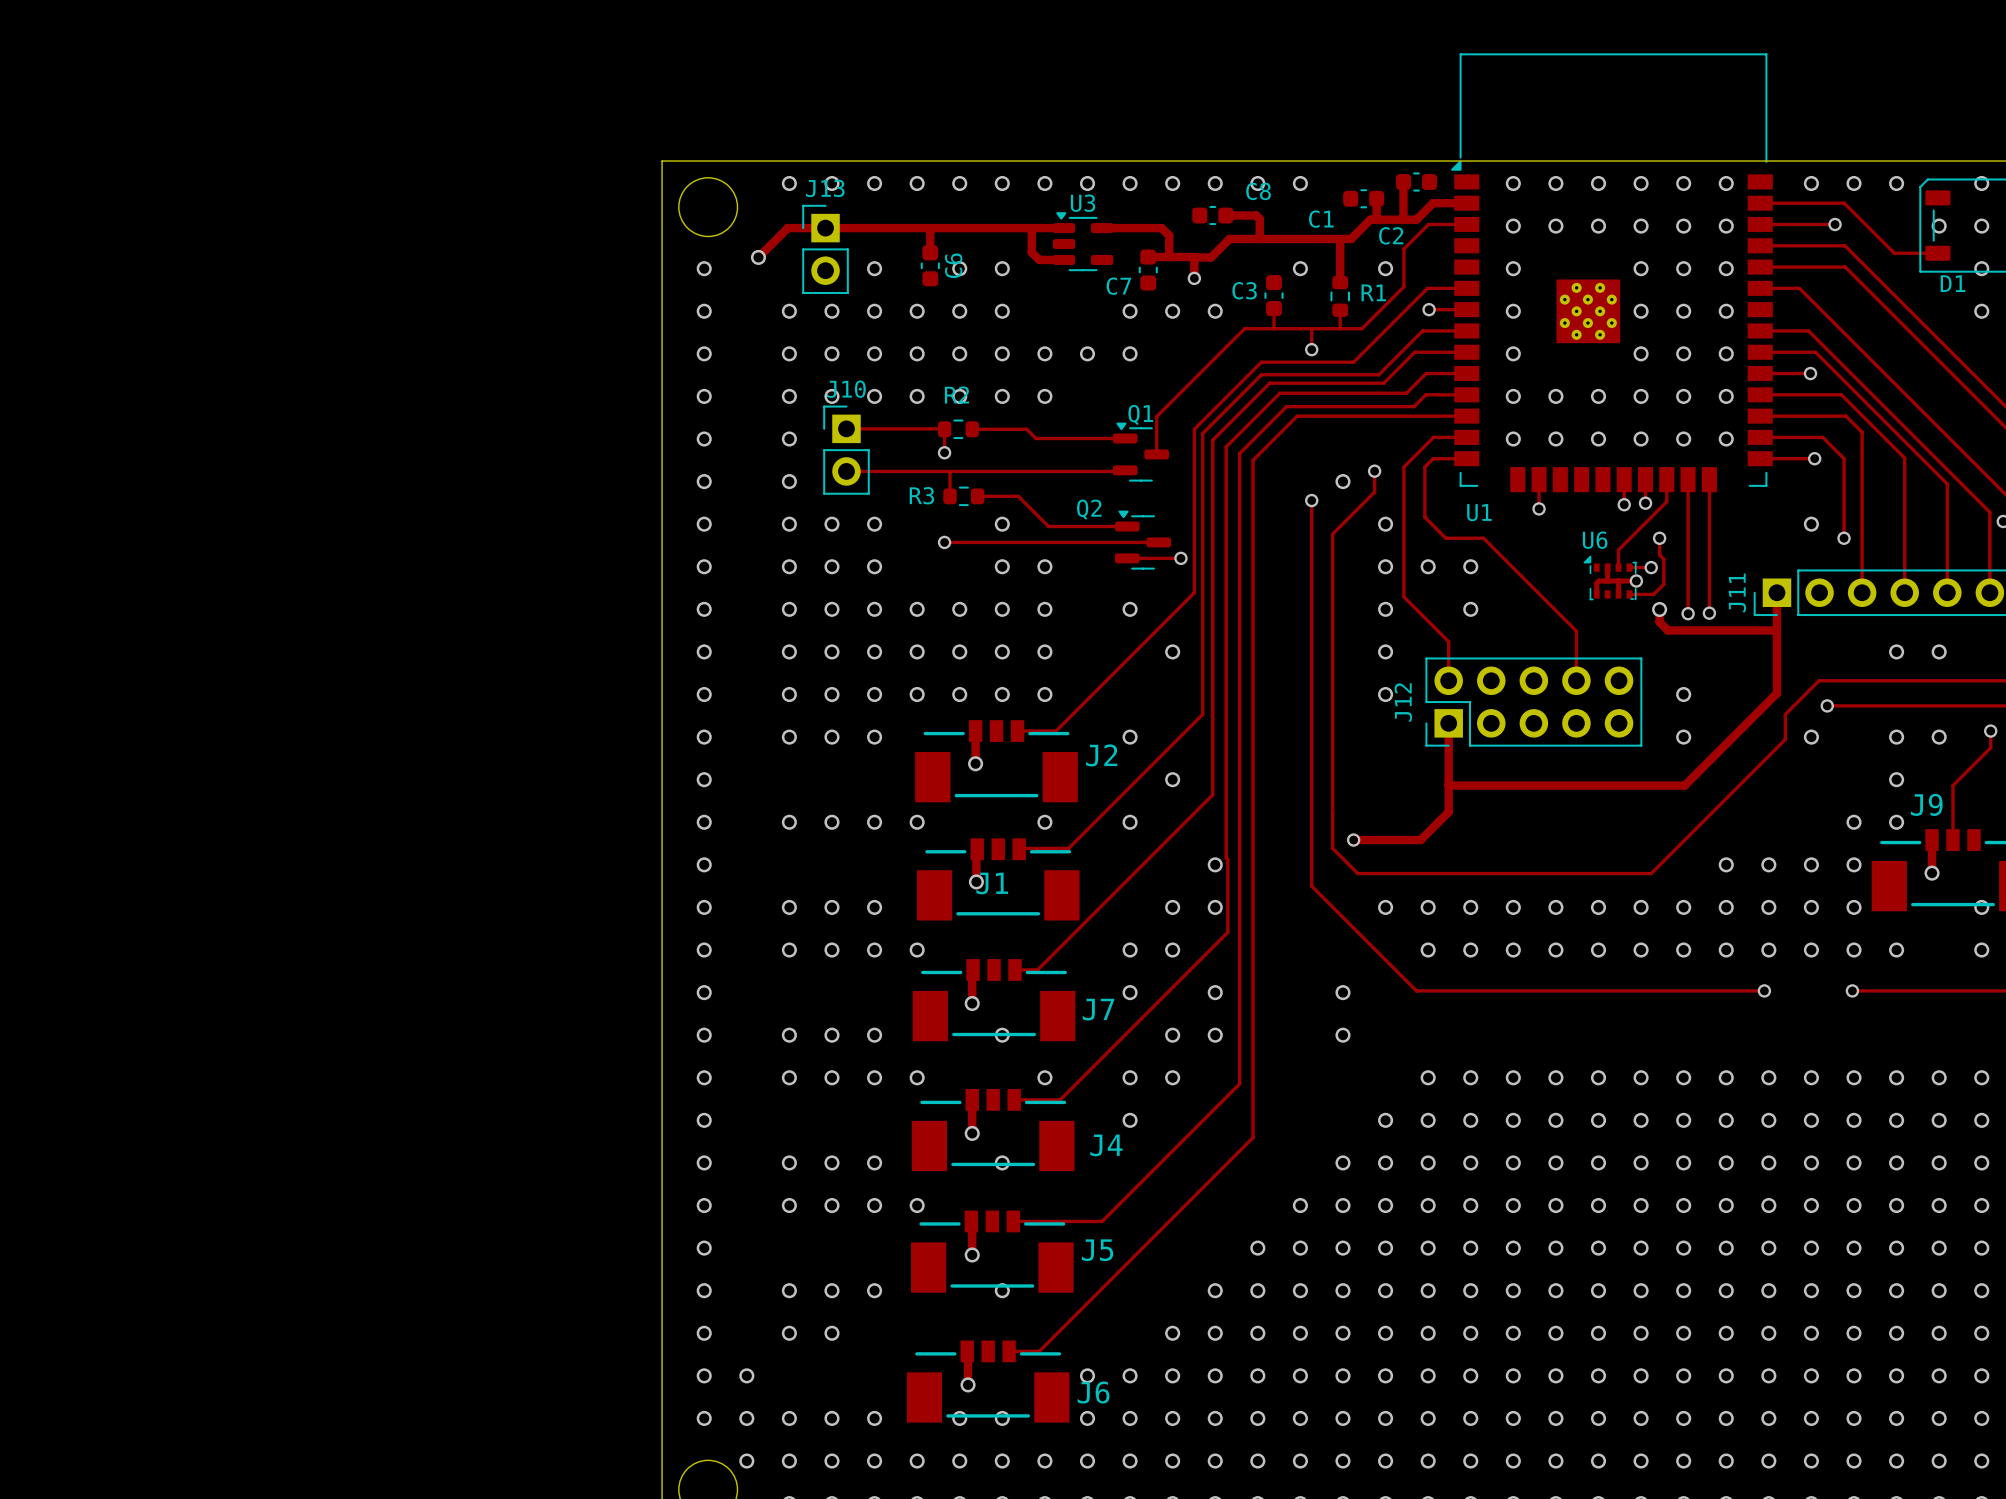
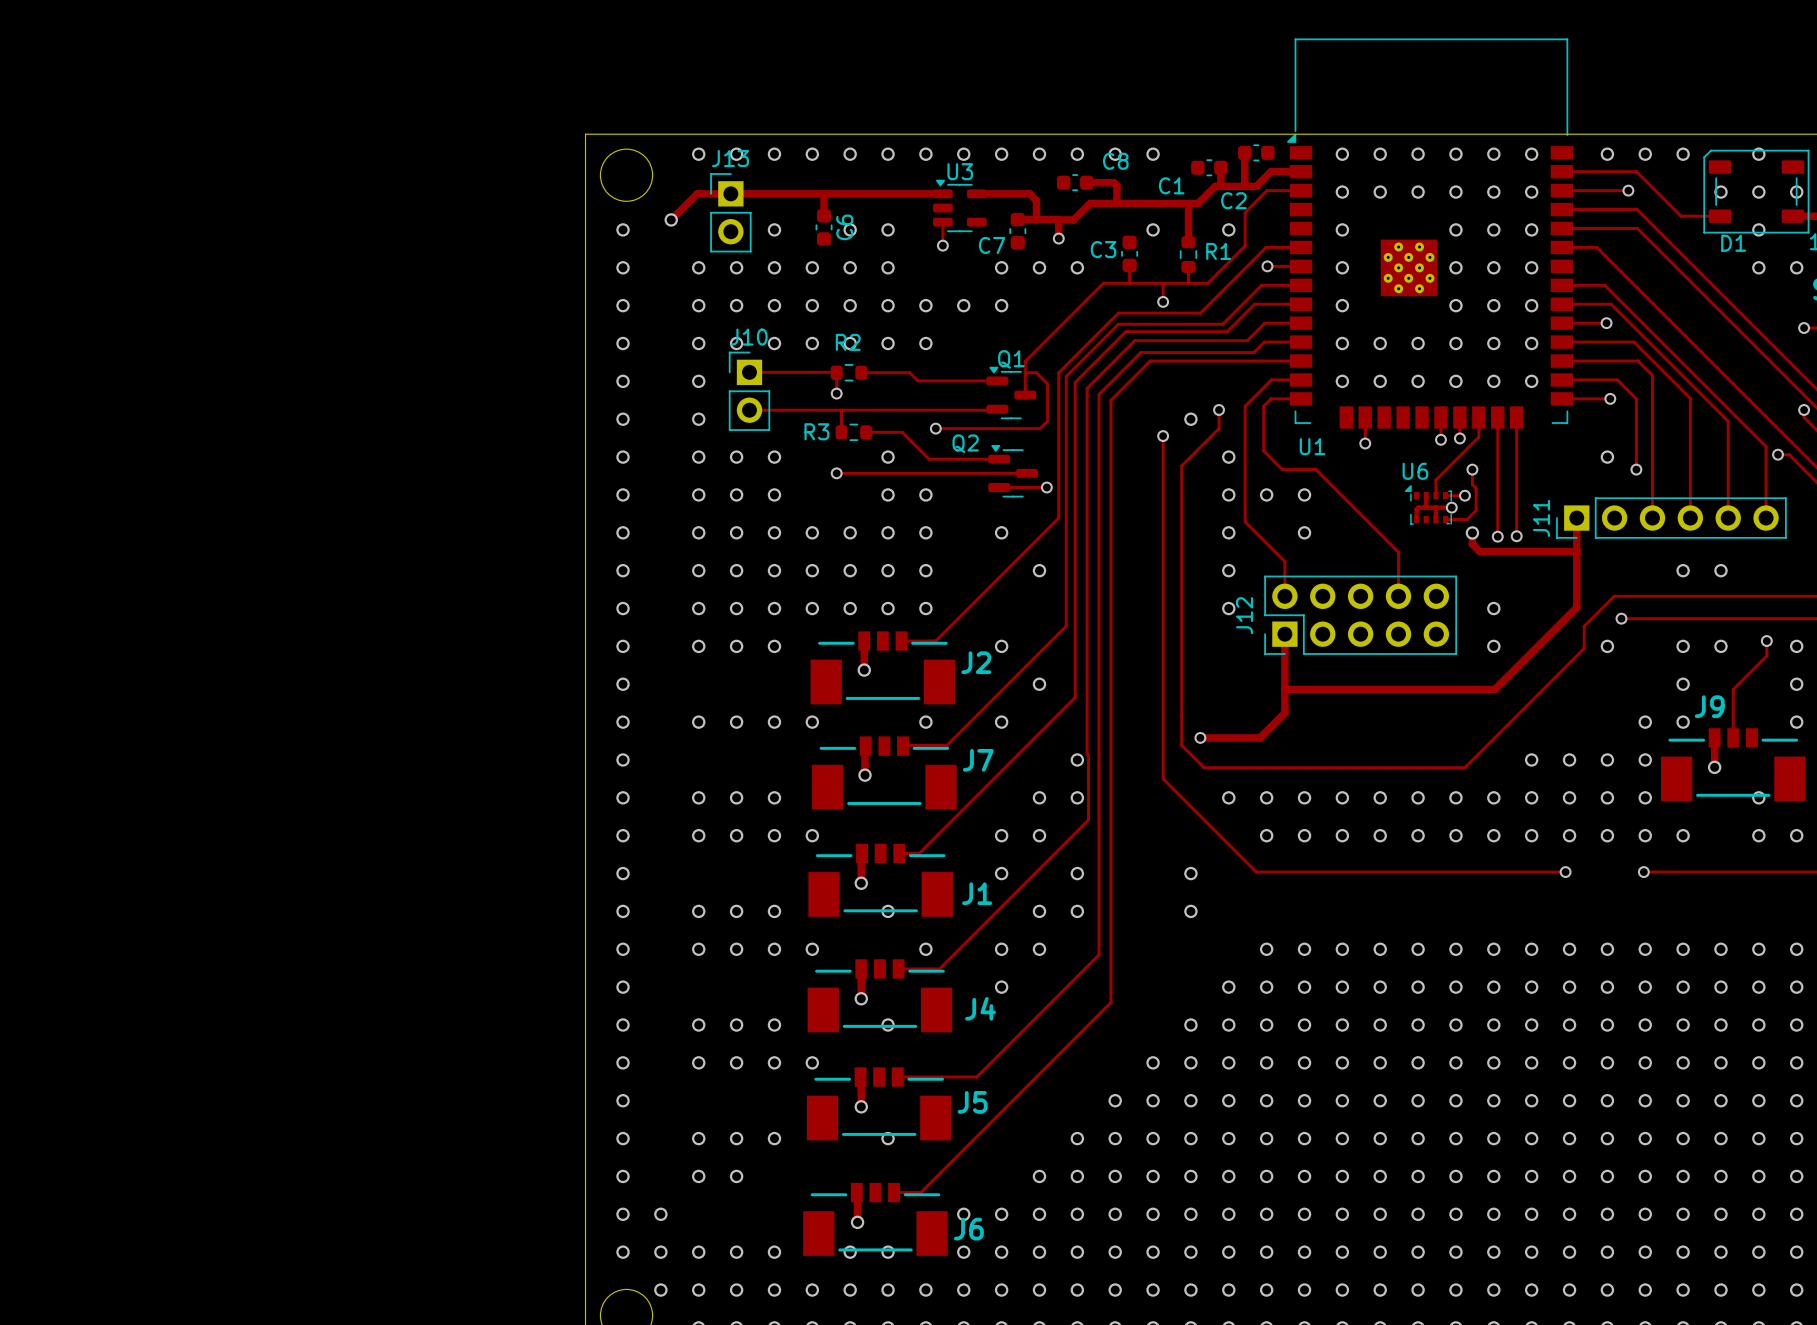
track: (1031, 228) (1031, 252) (1039, 259) (1064, 259) -> (942, 245) (942, 222)
via: none -> (942, 245)
track: none -> (1025, 372) (1036, 372) (1047, 383) (1047, 421) (1040, 428) (935, 428)
via: none -> (935, 428)
J1 name: J1 (992, 883) -> J7 (978, 760)
J7 name: J7 (1098, 1009) -> J1 (977, 893)

